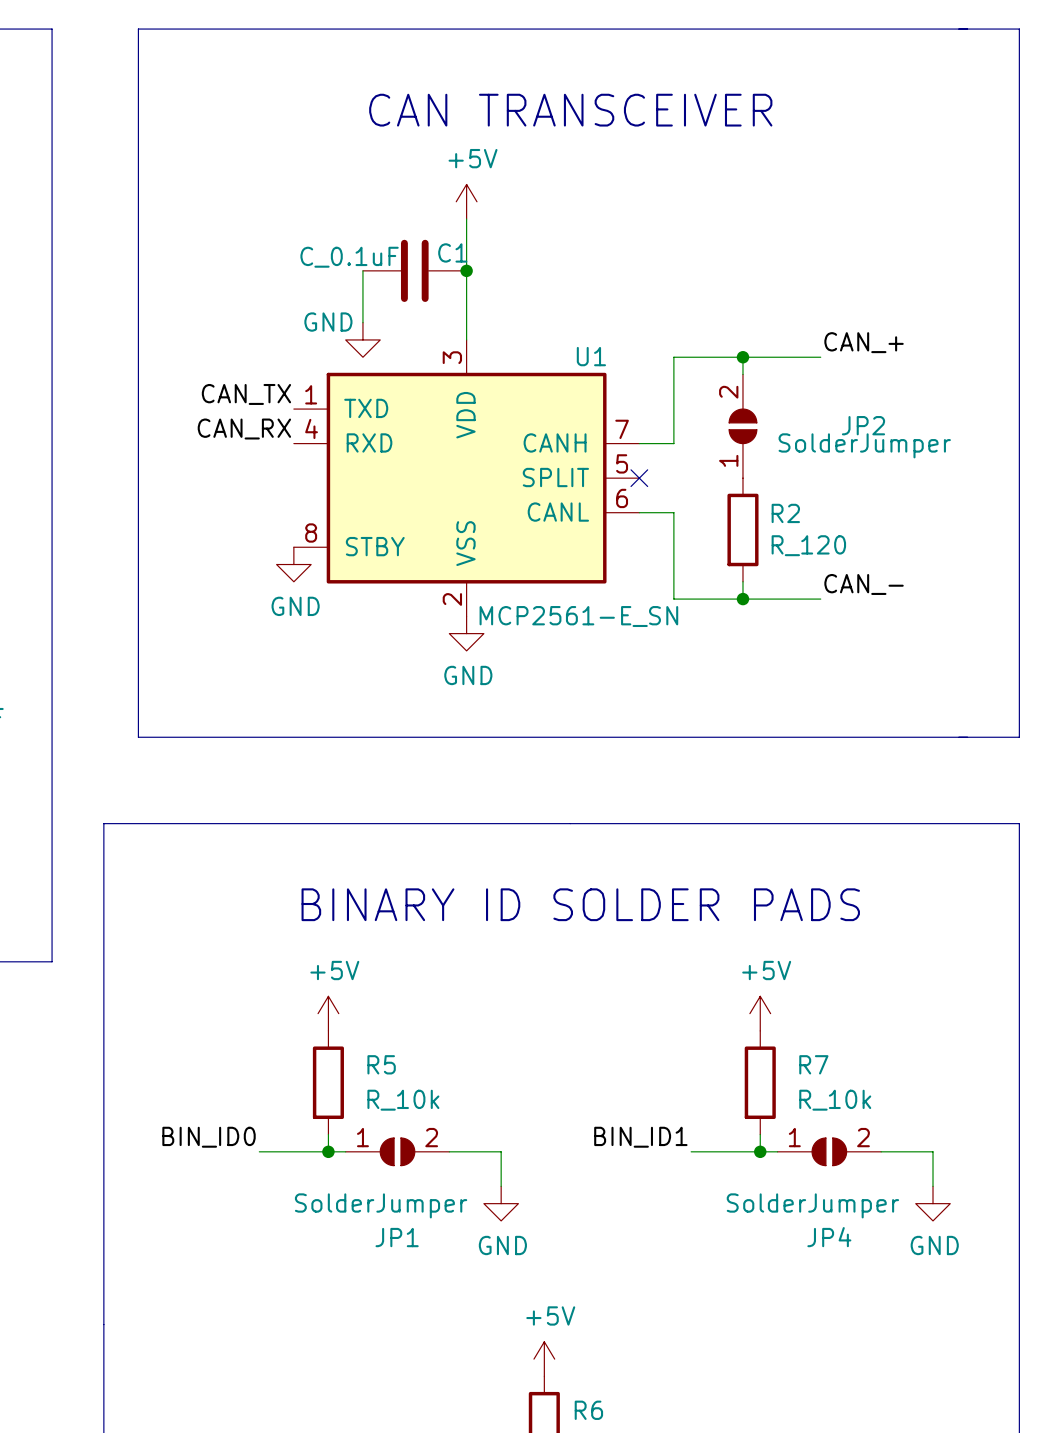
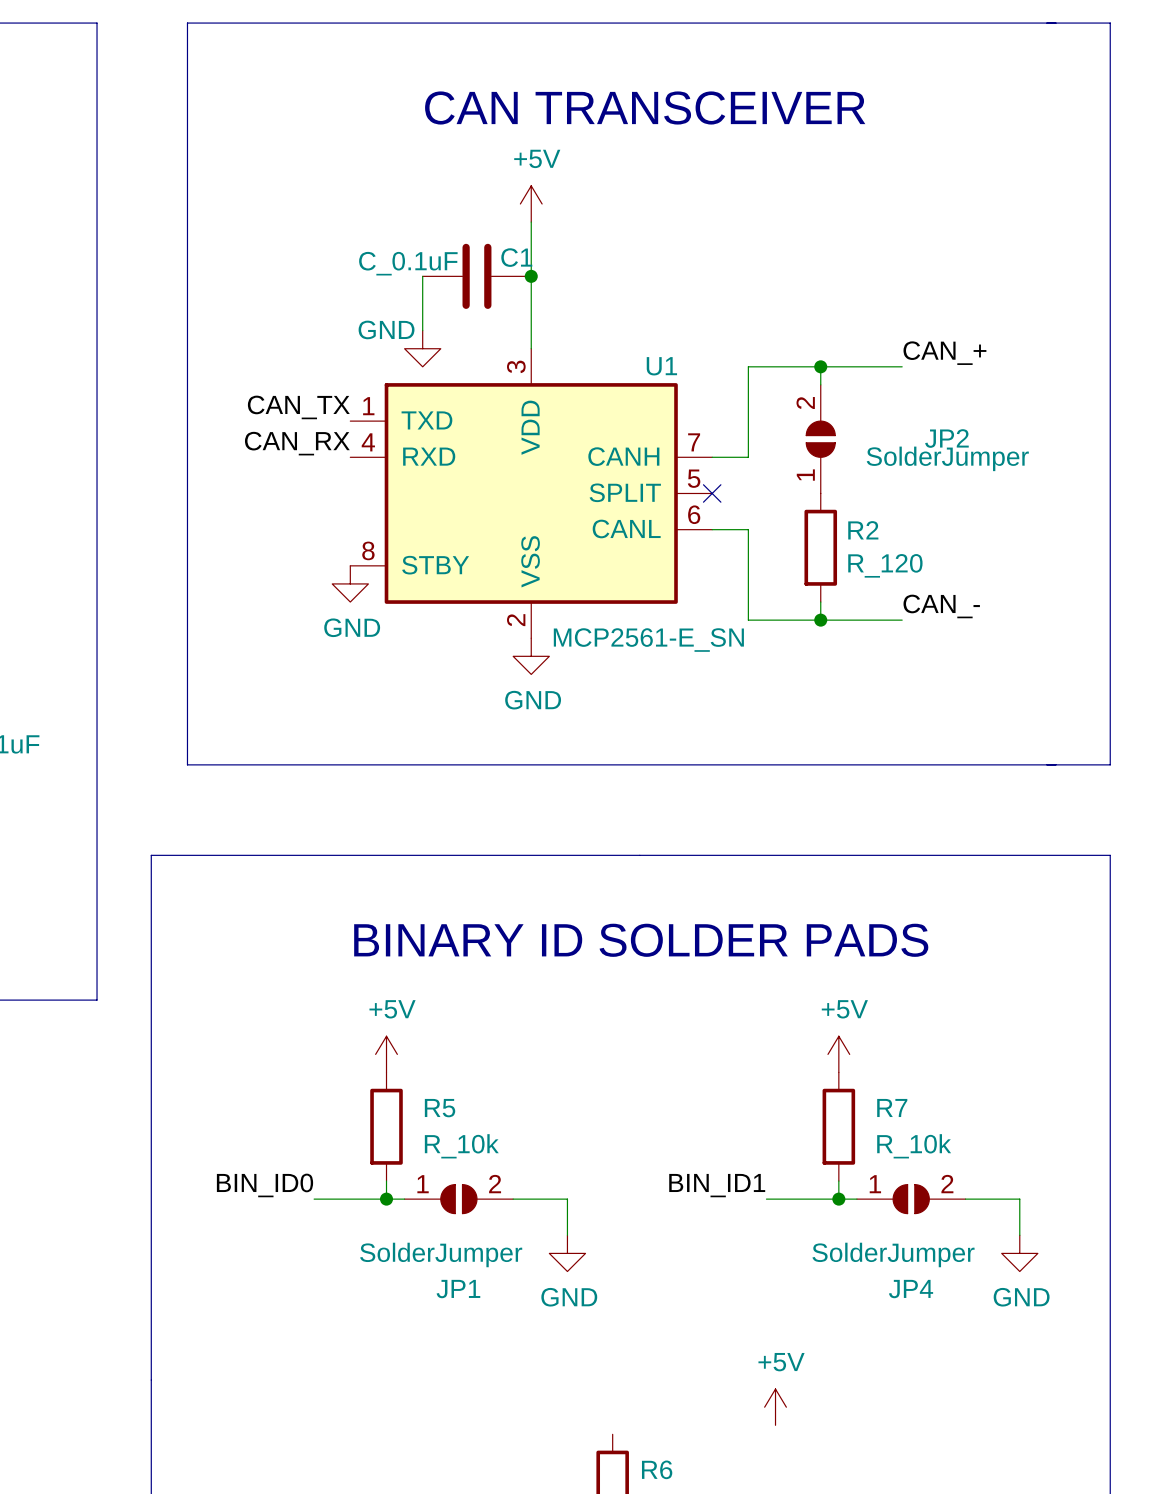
power symbol position: +5V (544, 1359) -> +5V (775, 1407)

